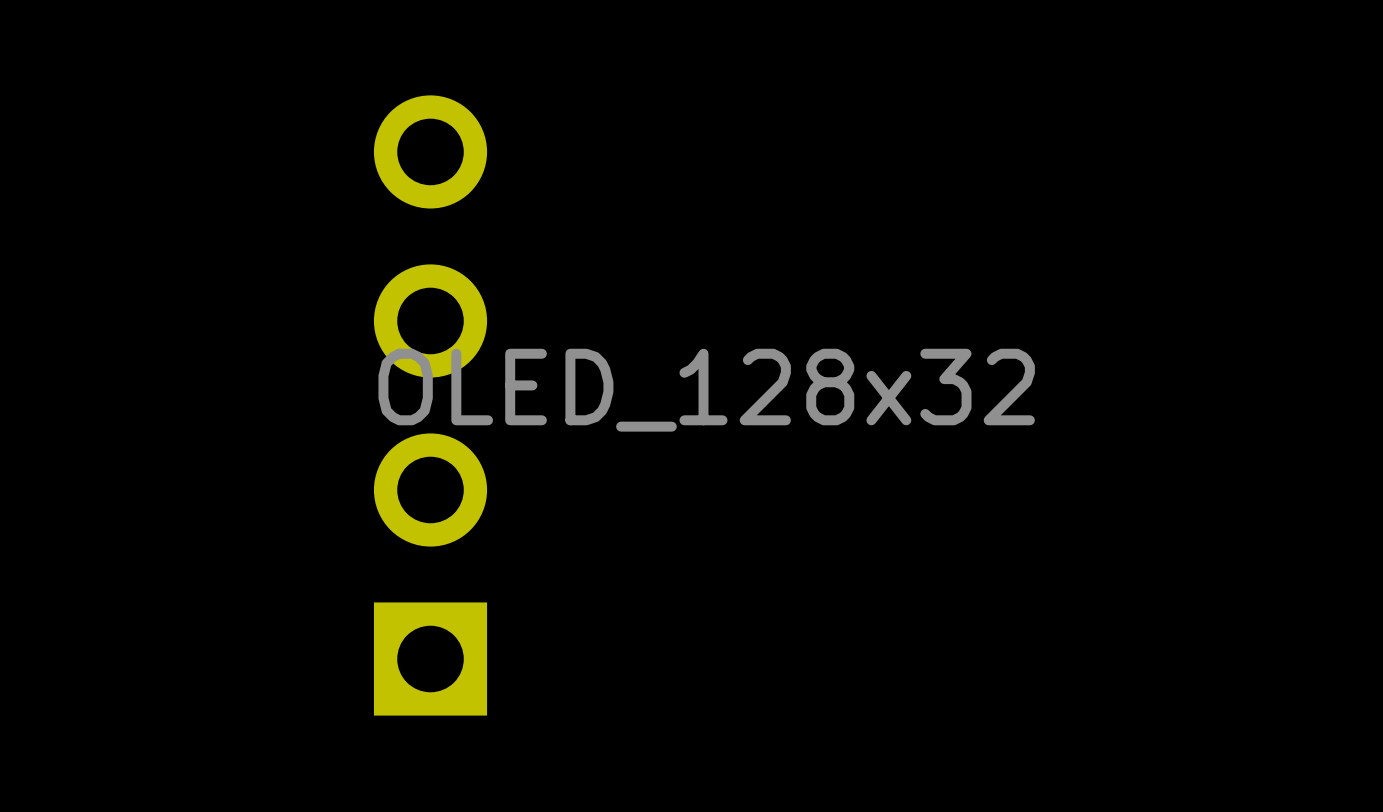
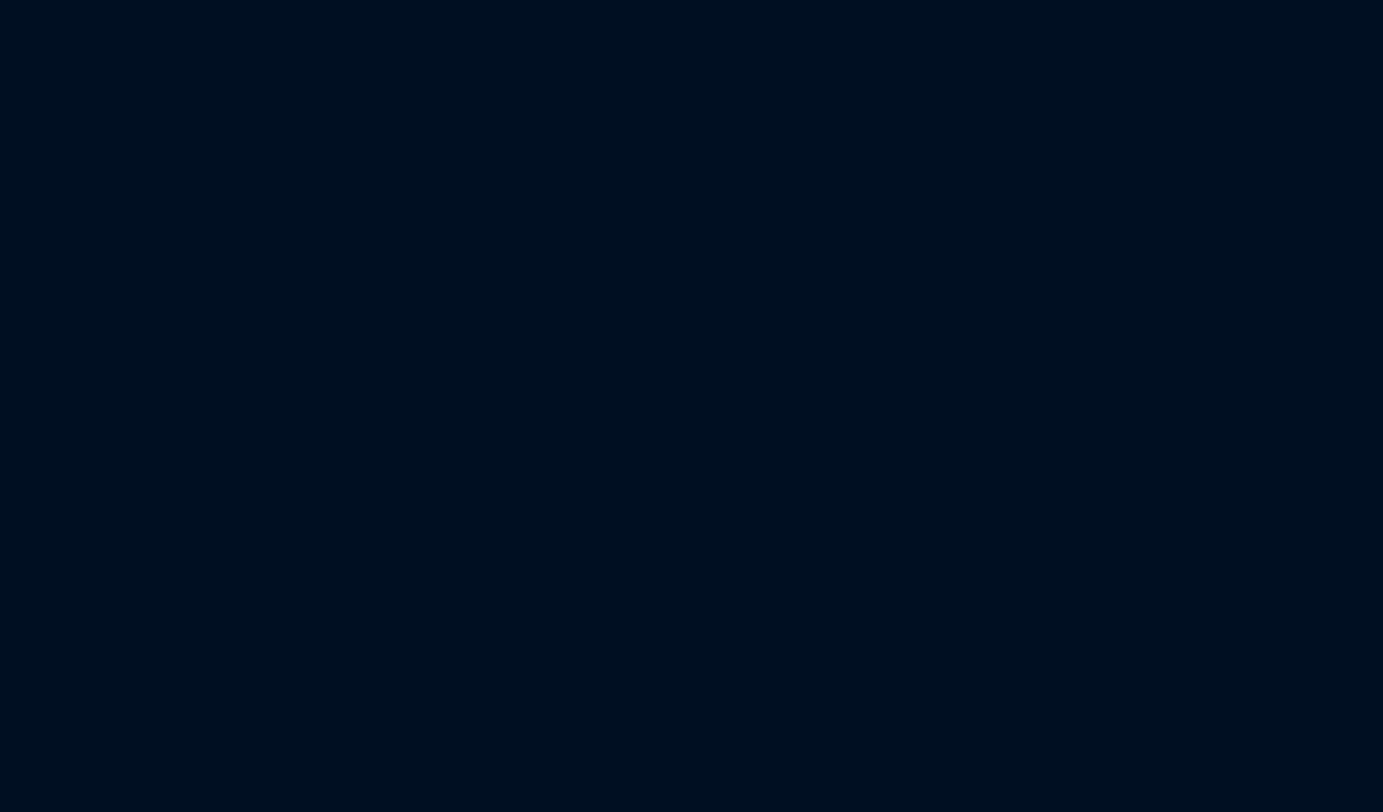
part: OLED_128x32 (430, 405) -> none

